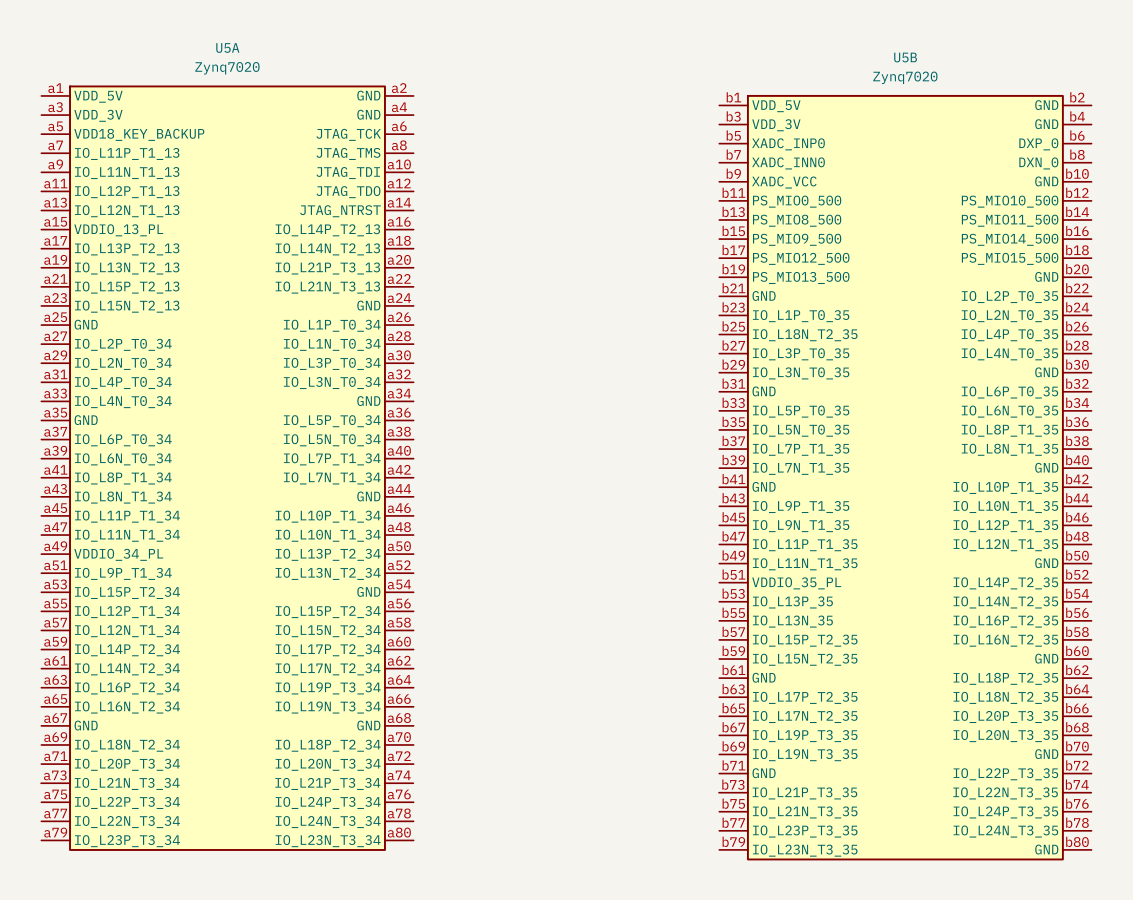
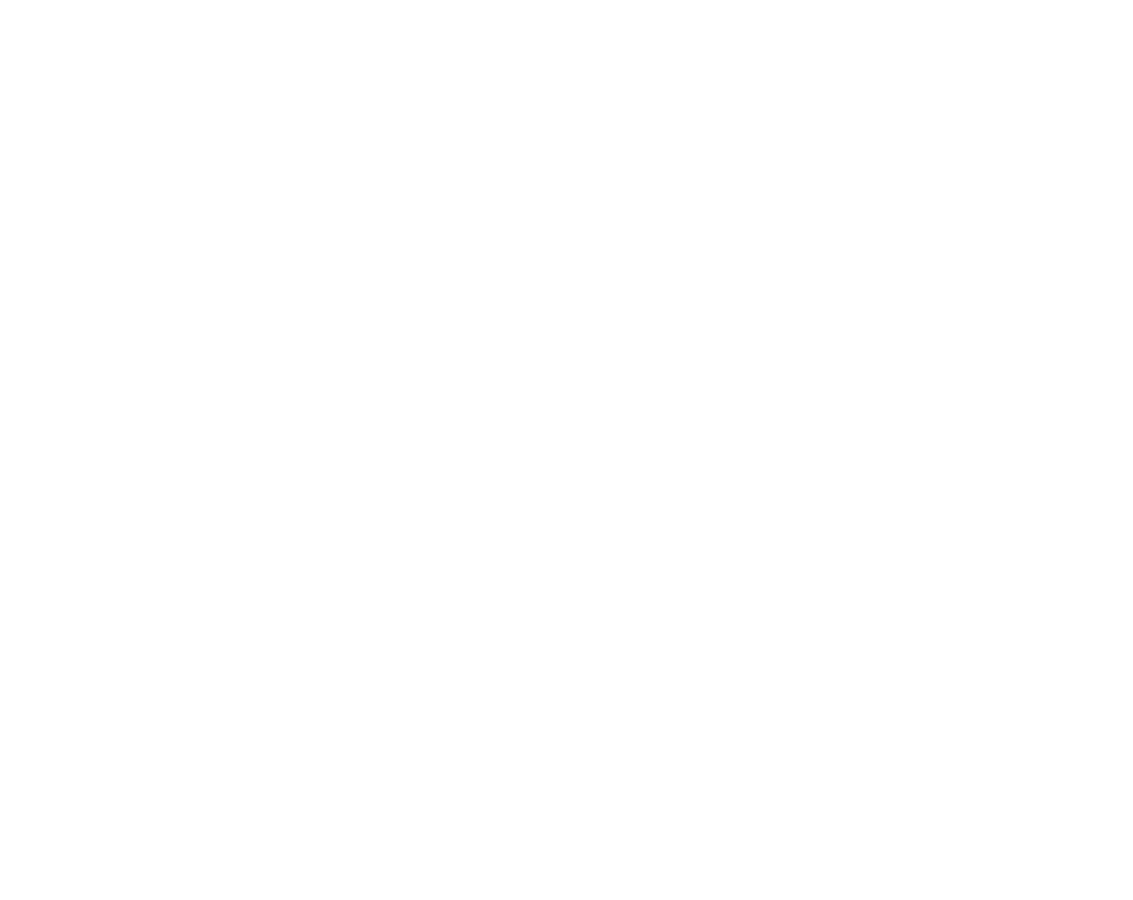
U5A: Zynq7020 (227, 468) -> none
U5B: Zynq7020 (905, 477) -> none

